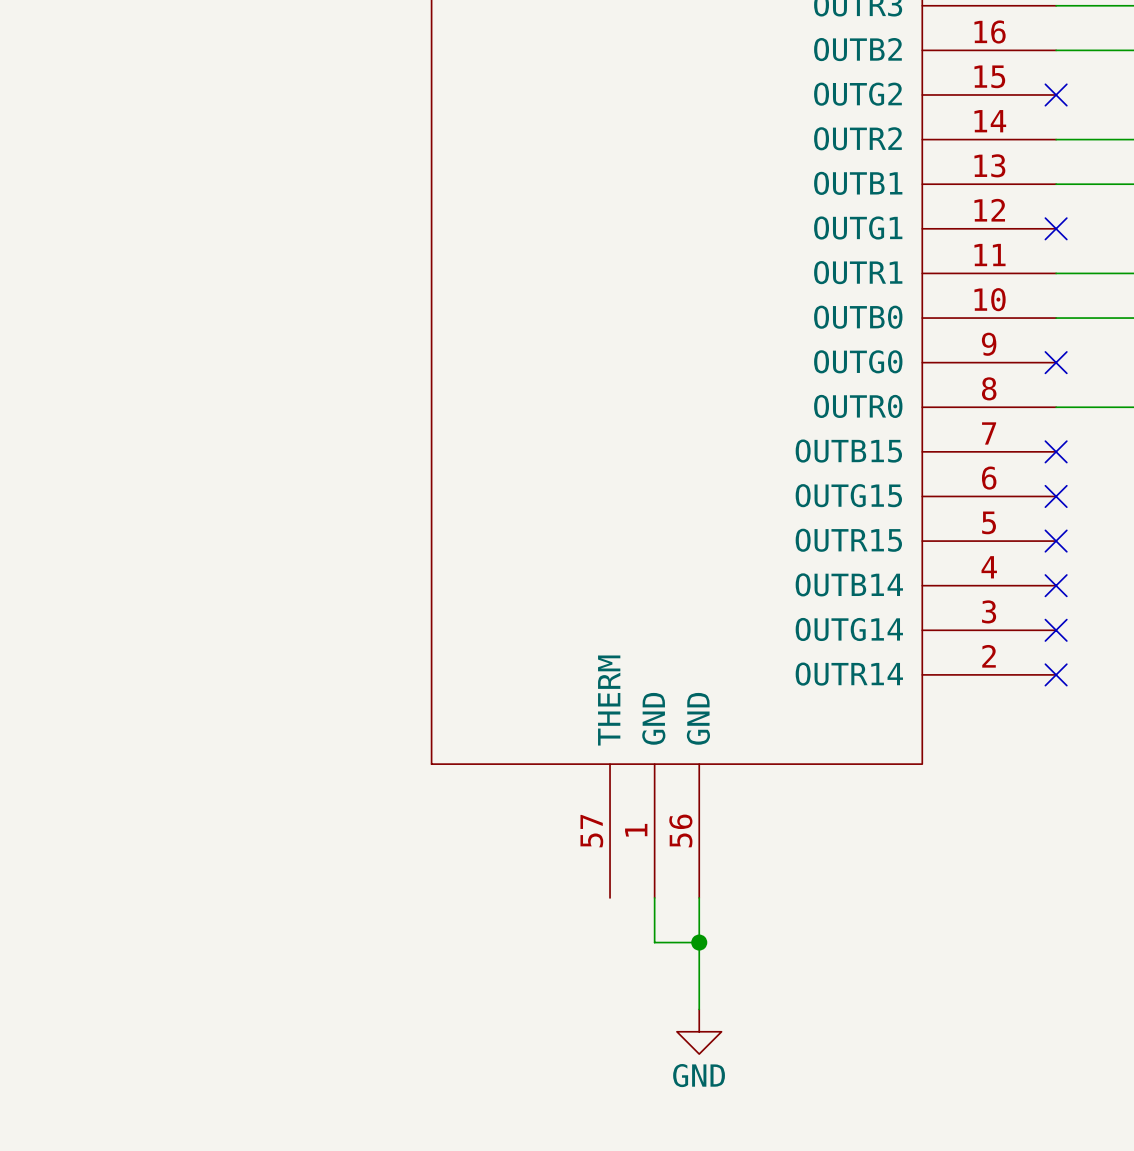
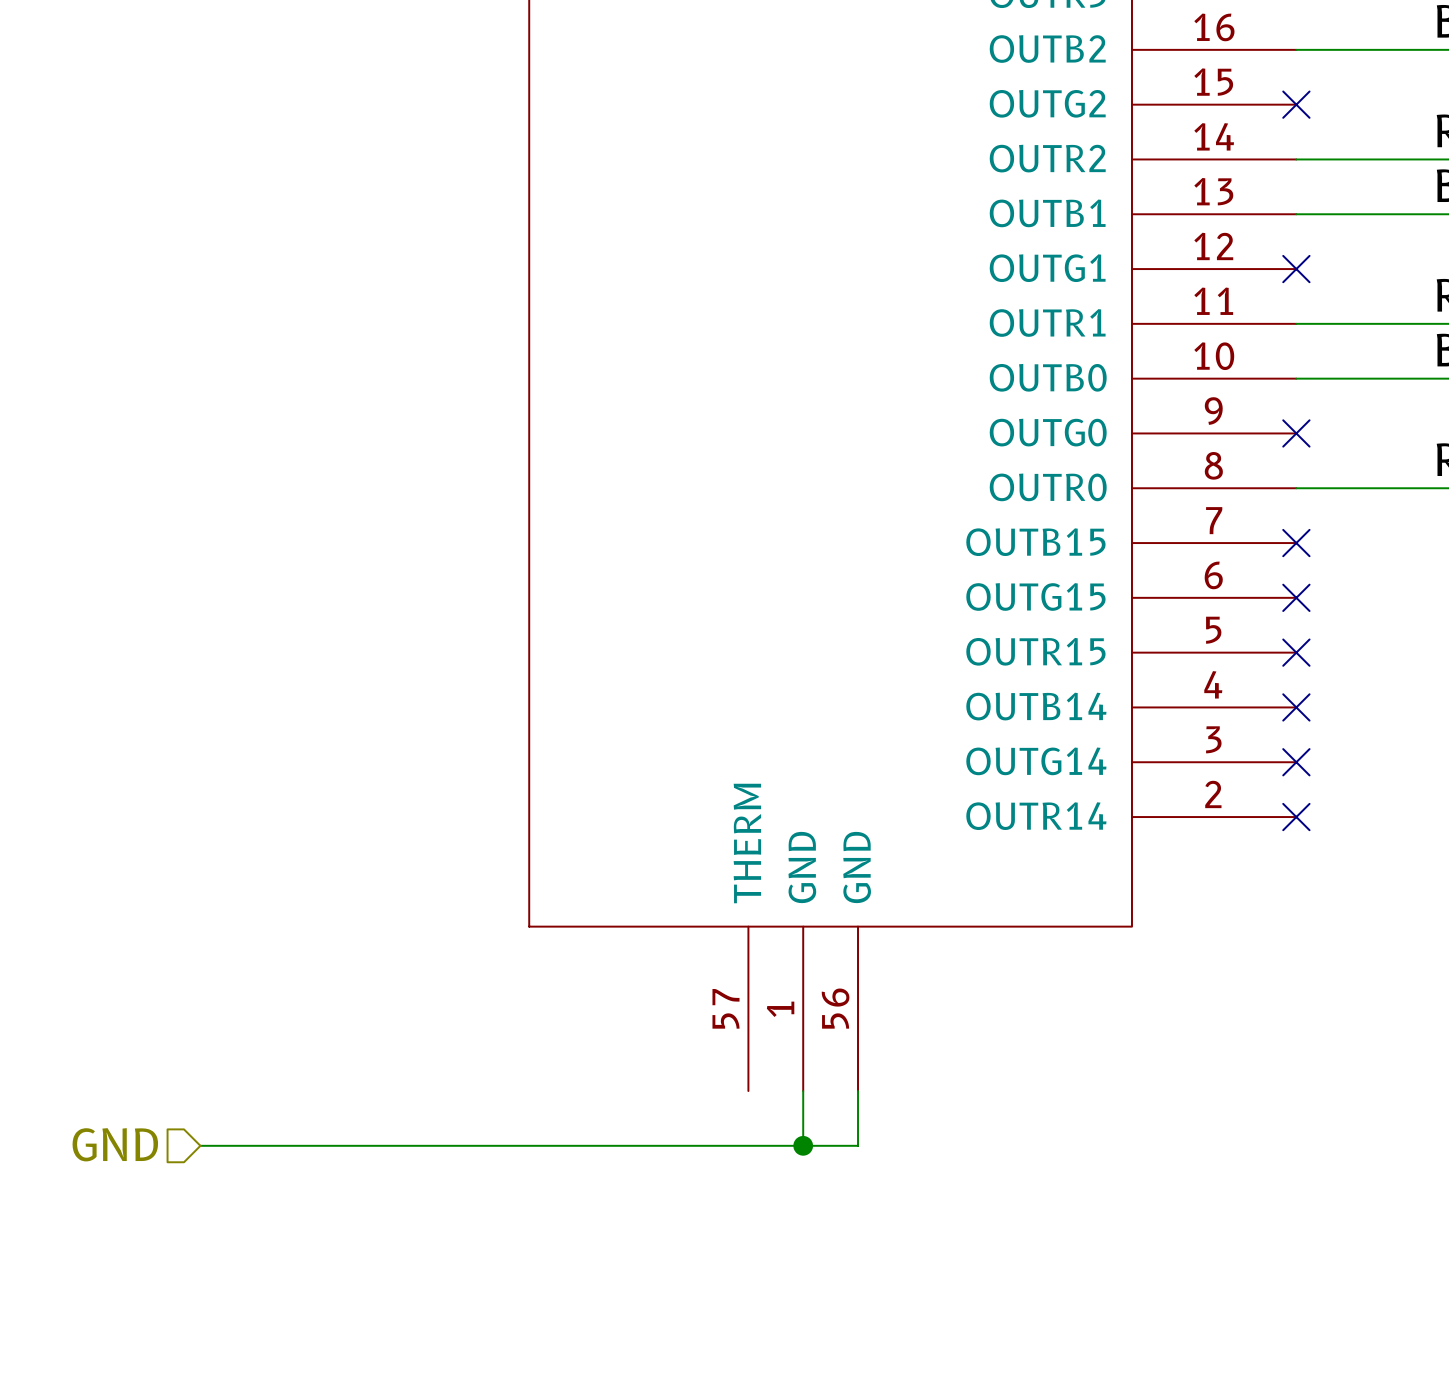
hierarchical label: none -> GND (115, 1144)
wire: none -> (200, 1145) (803, 1145)
wire: (699, 942) (699, 1009) -> none
junction position: (699, 942) -> (803, 1145)
power symbol: GND (699, 1031) -> none

